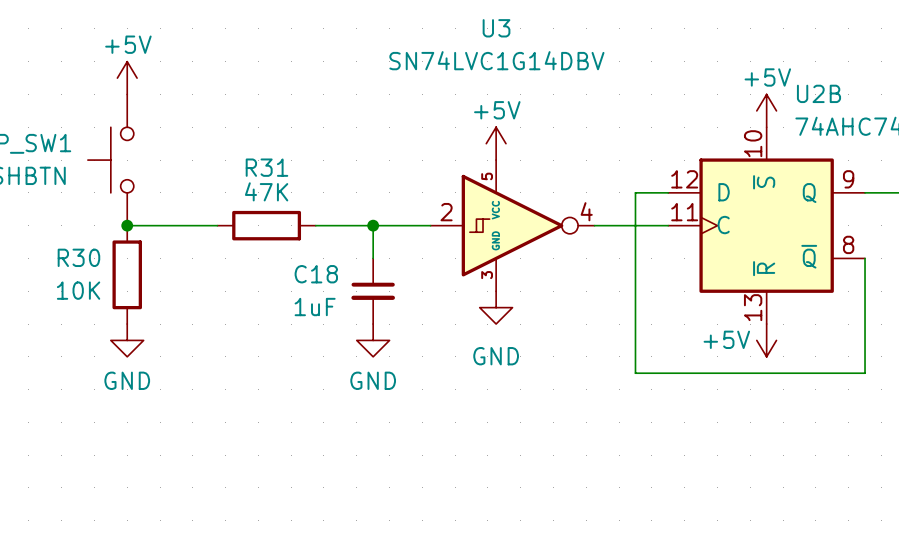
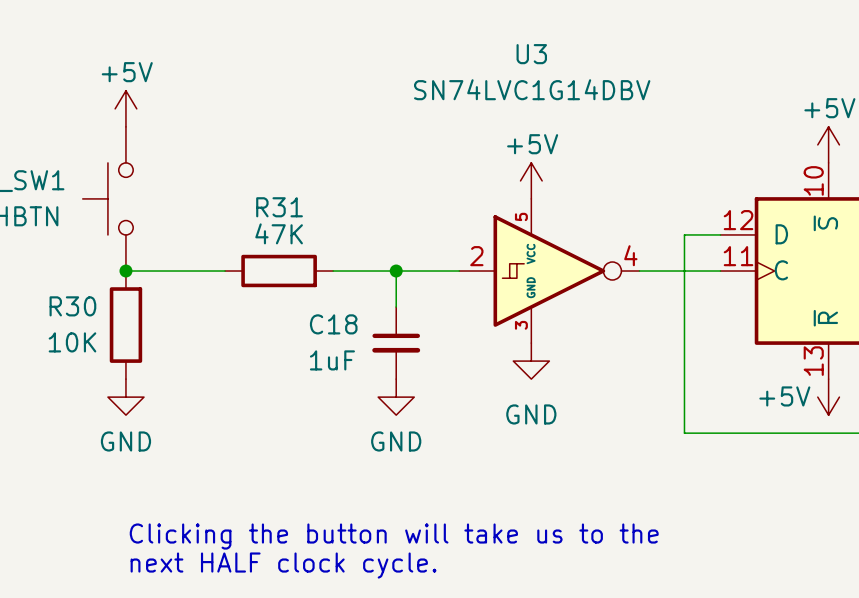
text: none -> Clicking the button will take us to the (394, 536)
text: none -> next HALF clock cycle. (283, 565)

